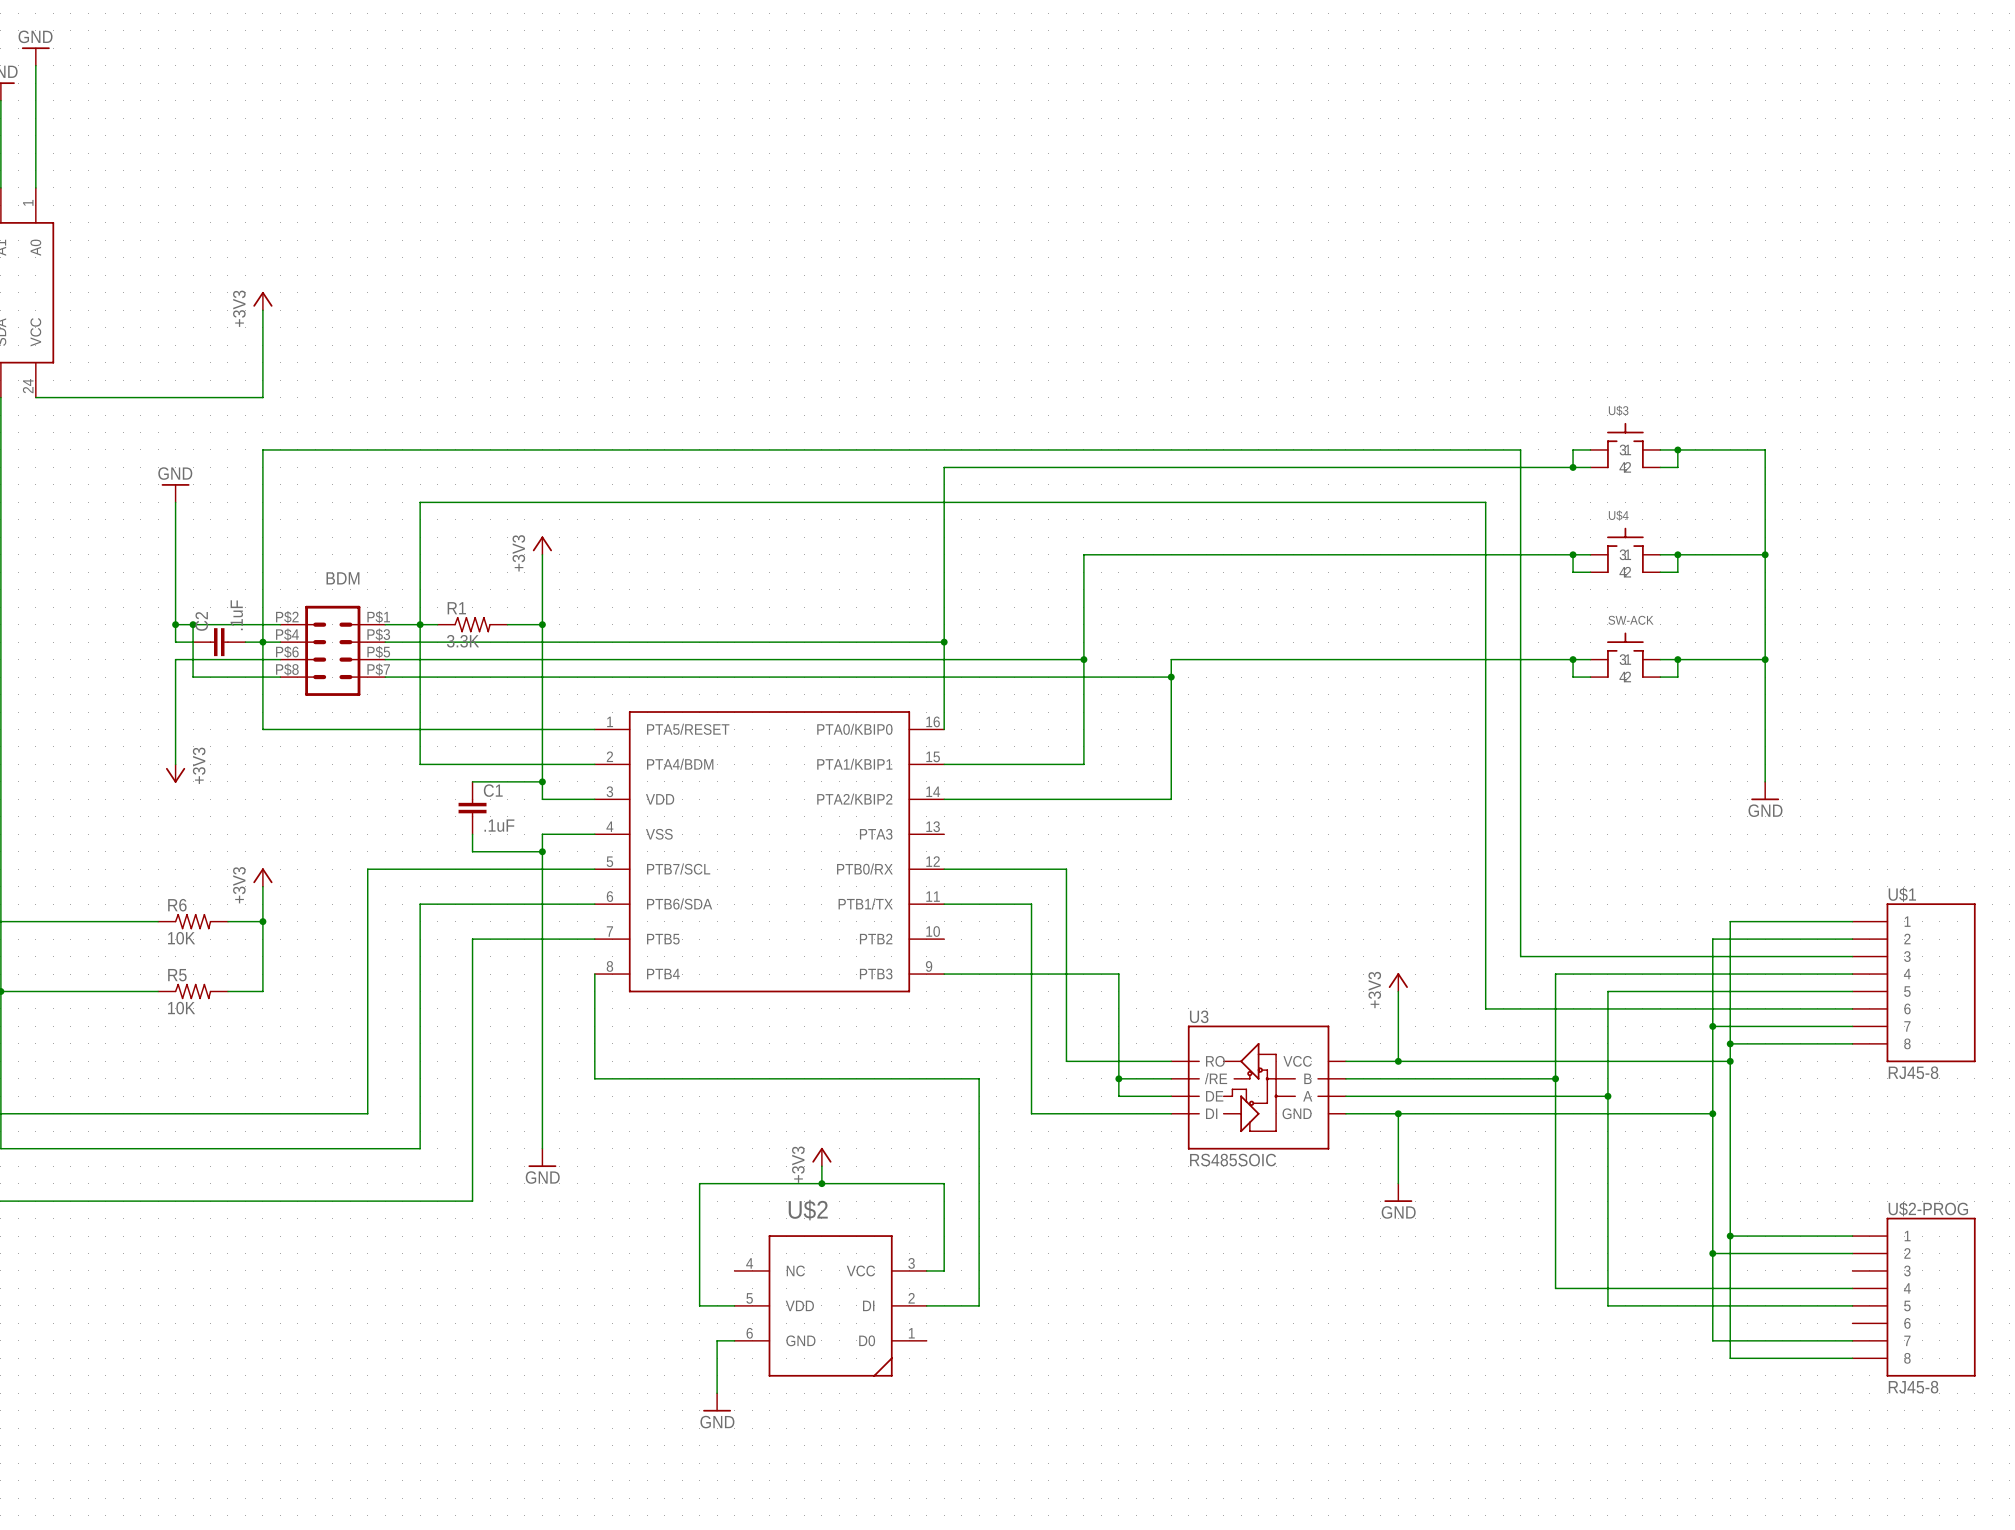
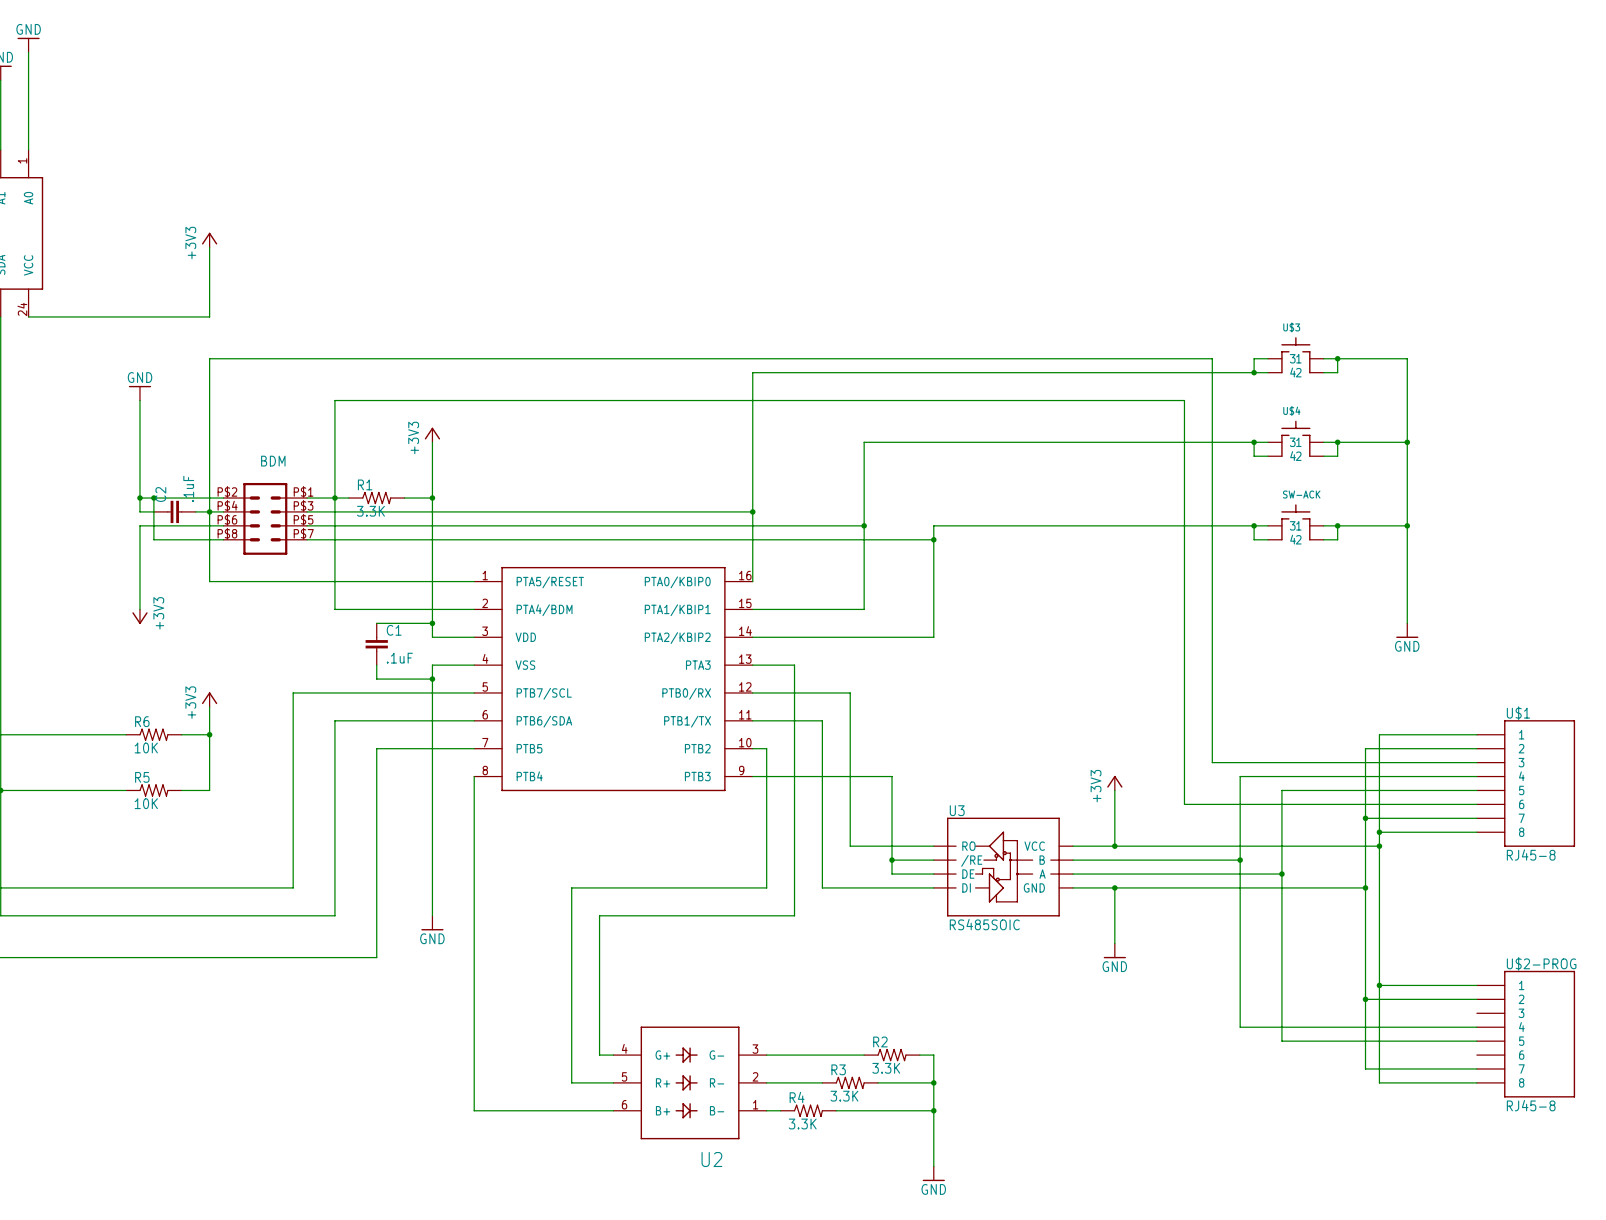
wire: none -> (752, 665) (794, 665) (794, 915) (599, 915) (599, 1055) (613, 1055)
wire: (594, 1078) (979, 1078) (979, 1305) (926, 1305) -> (474, 860) (474, 1110) (613, 1110)
power symbol: +3V3 (821, 1157) -> none
wire: (821, 1166) (821, 1183) -> none
junction: (821, 1183) -> none
wire: (926, 1270) (944, 1270) (944, 1183) (699, 1183) (699, 1305) (734, 1305) -> none
U$2: (830, 1305) -> none
wire: none -> (766, 1055) (864, 1055)
R2: none -> 3.3K (892, 1055)
wire: none -> (919, 1055) (933, 1055) (933, 1166)
wire: (717, 1340) (734, 1340) -> (571, 1068) (571, 887) (766, 887) (766, 748) (752, 748)
wire: (717, 1358) (717, 1393) -> (571, 1082) (613, 1082)
U2: none -> (690, 1082)
wire: none -> (766, 1082) (822, 1082)
R3: none -> 3.3K (850, 1082)
wire: none -> (878, 1082) (933, 1082)
junction: none -> (933, 1082)
wire: none -> (766, 1110) (780, 1110)
R4: none -> 3.3K (808, 1110)
wire: none -> (836, 1110) (933, 1110)
junction: none -> (933, 1110)
power symbol: GND (717, 1402) -> none
power symbol: none -> GND (933, 1173)

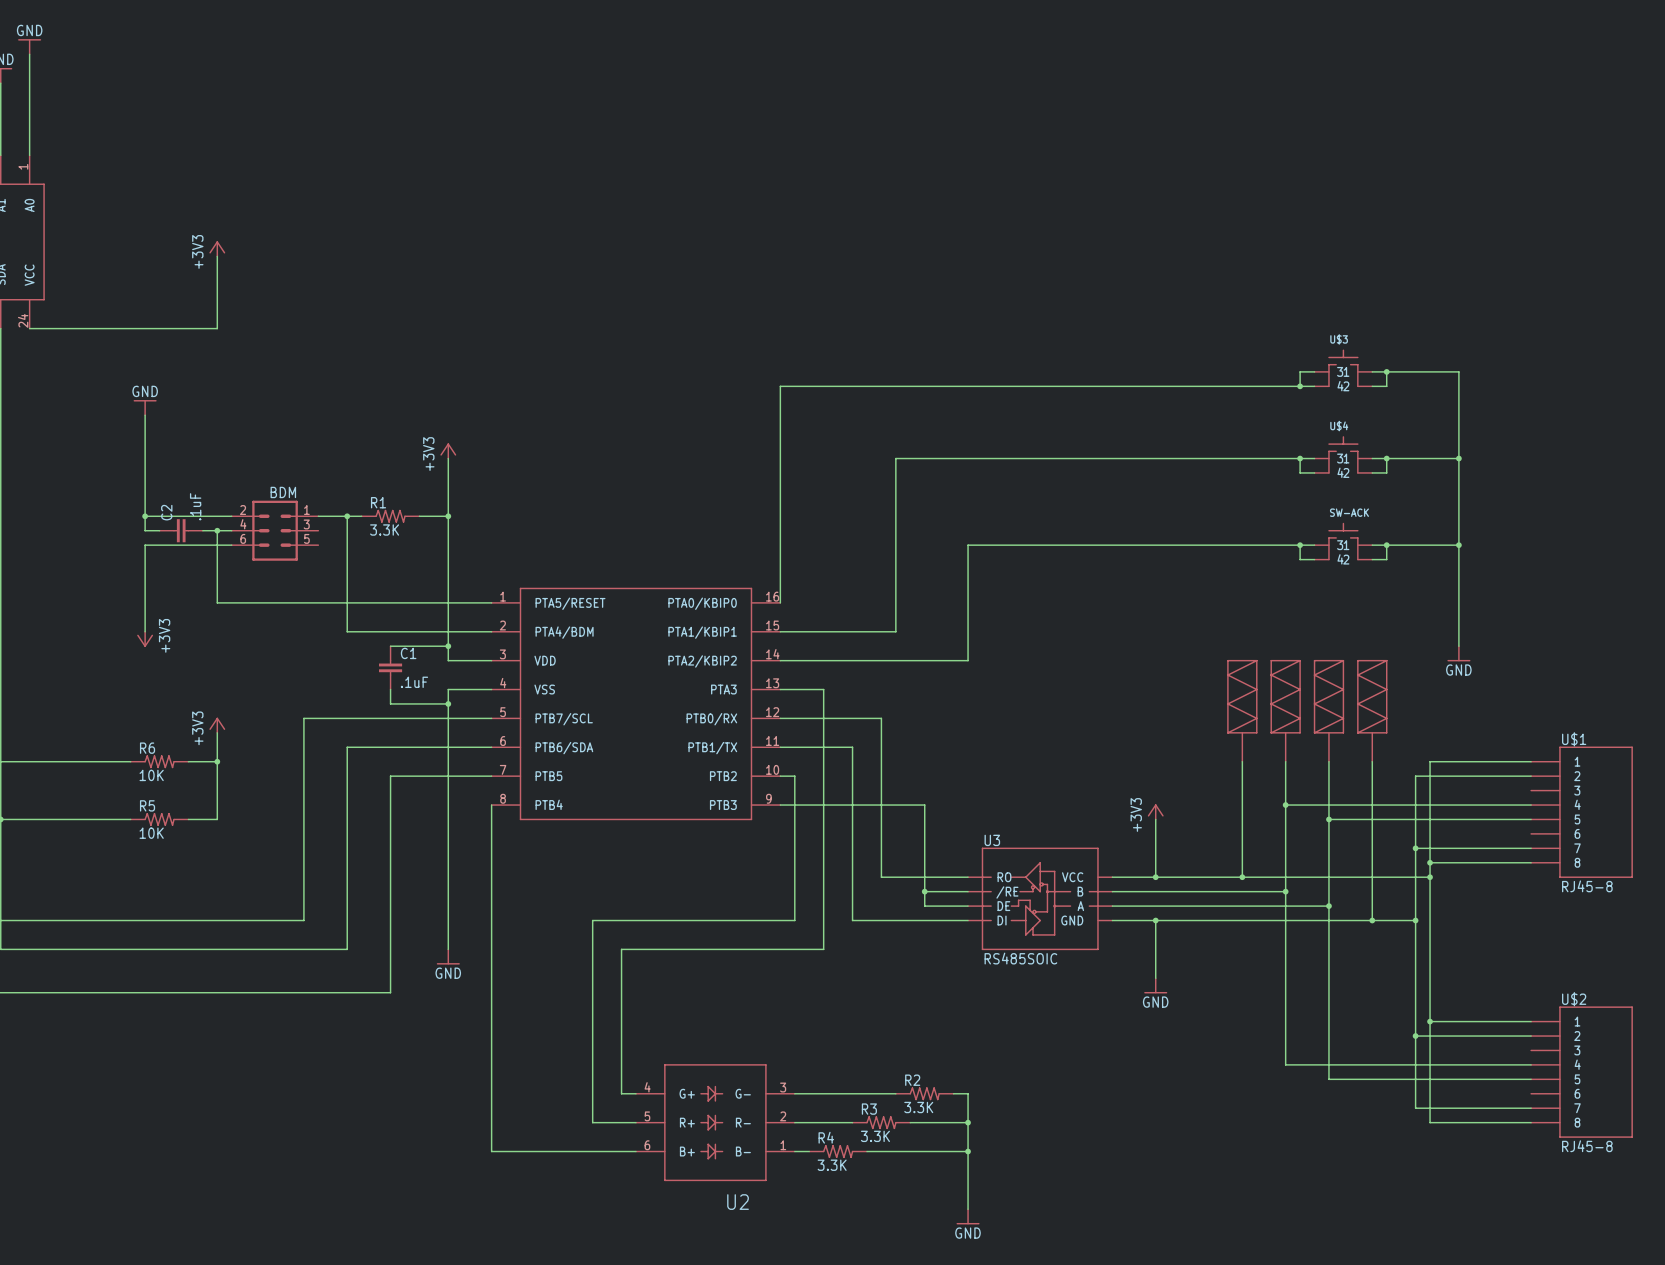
wire: (153, 498) (153, 539) (223, 539) -> none
junction: (153, 498) -> none
wire: (334, 498) (334, 400) (1184, 400) (1184, 804) (1476, 804) -> none
wire: (209, 511) (209, 358) (1212, 358) (1212, 762) (1476, 762) -> none
BDM: none -> (275, 530)
wire: (307, 511) (752, 511) -> none
junction: (752, 511) -> none
BDM: (265, 518) -> none
wire: (307, 525) (864, 525) -> none
junction: (864, 525) -> none
wire: (307, 539) (933, 539) -> none
junction: (933, 539) -> none
part: none -> (1242, 710)
part: none -> (1285, 710)
part: none -> (1328, 710)
part: none -> (1372, 710)
wire: none -> (1242, 761) (1242, 877)
wire: none -> (1285, 761) (1285, 805)
wire: none -> (1328, 761) (1328, 819)
wire: none -> (1372, 761) (1372, 920)
junction: none -> (1285, 805)
junction: none -> (1328, 819)
junction: none -> (1242, 877)
junction: none -> (1372, 920)
U$2-PROG name: U$2-PROG (1541, 963) -> U$2 (1574, 999)

